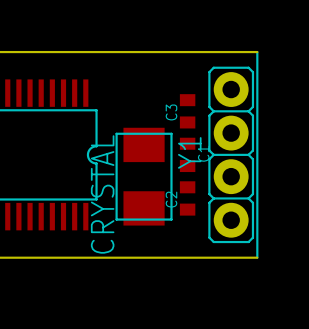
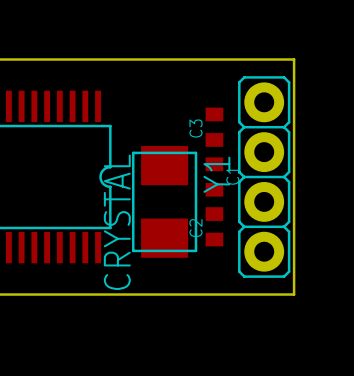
board edge: none -> (294, 59) (294, 294)
line: (257, 52) (257, 257) -> none

